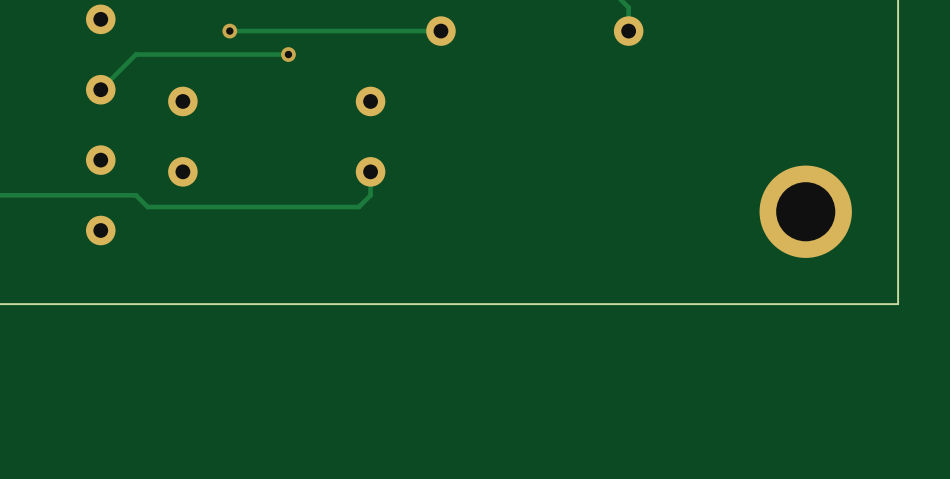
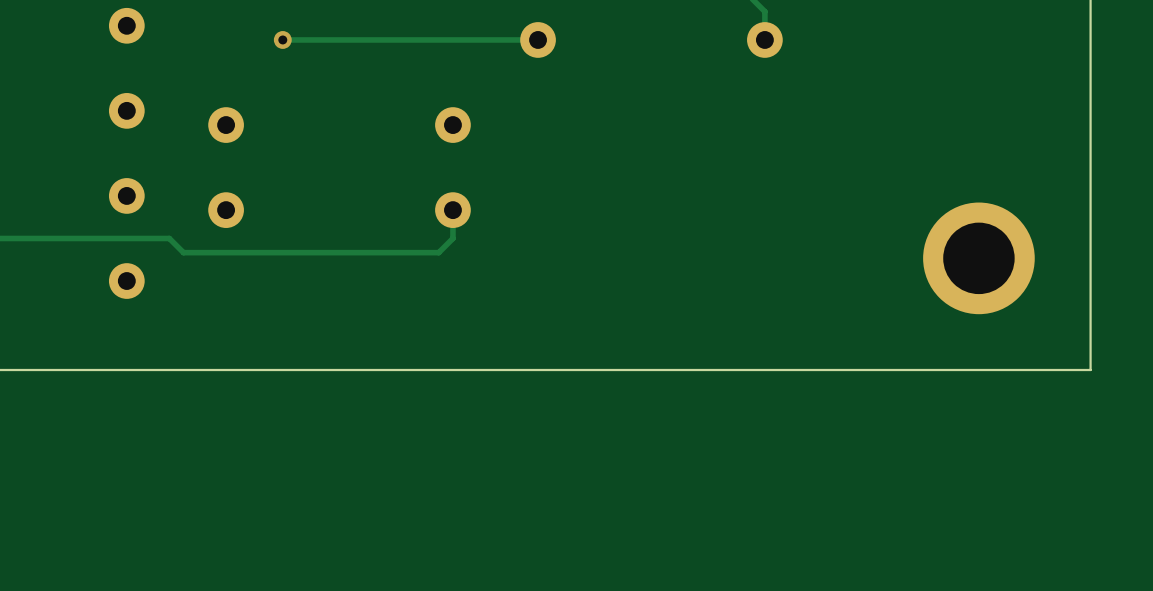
track: (288, 54) (135, 54) (100, 89) -> none
via: (288, 54) -> none

